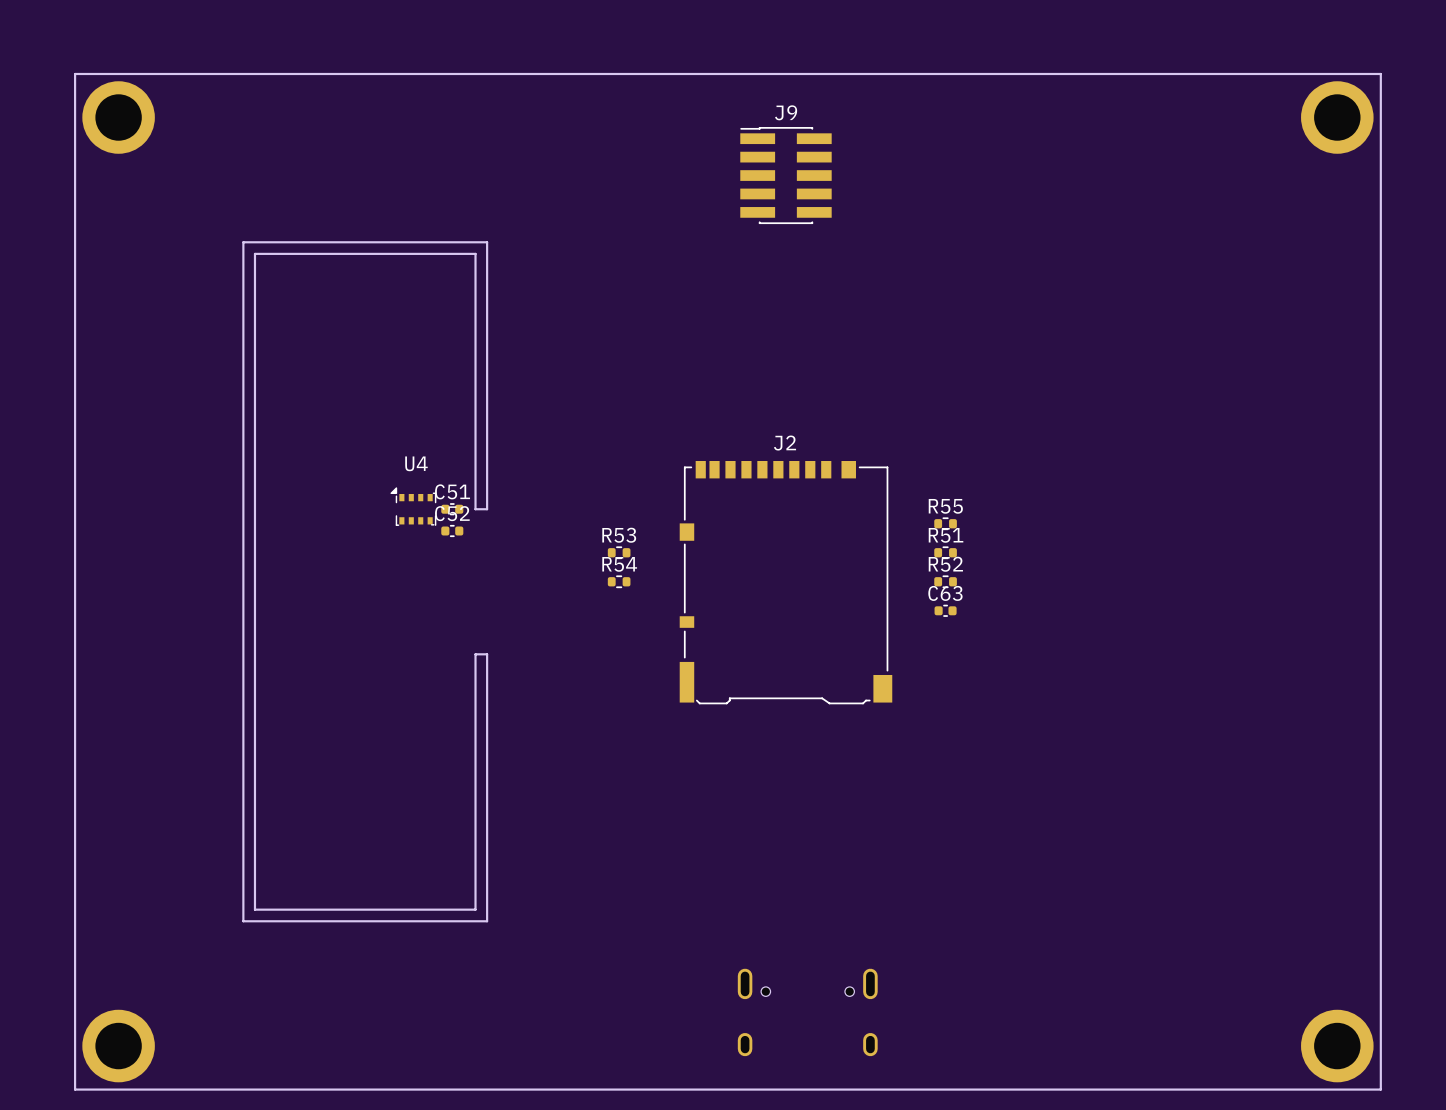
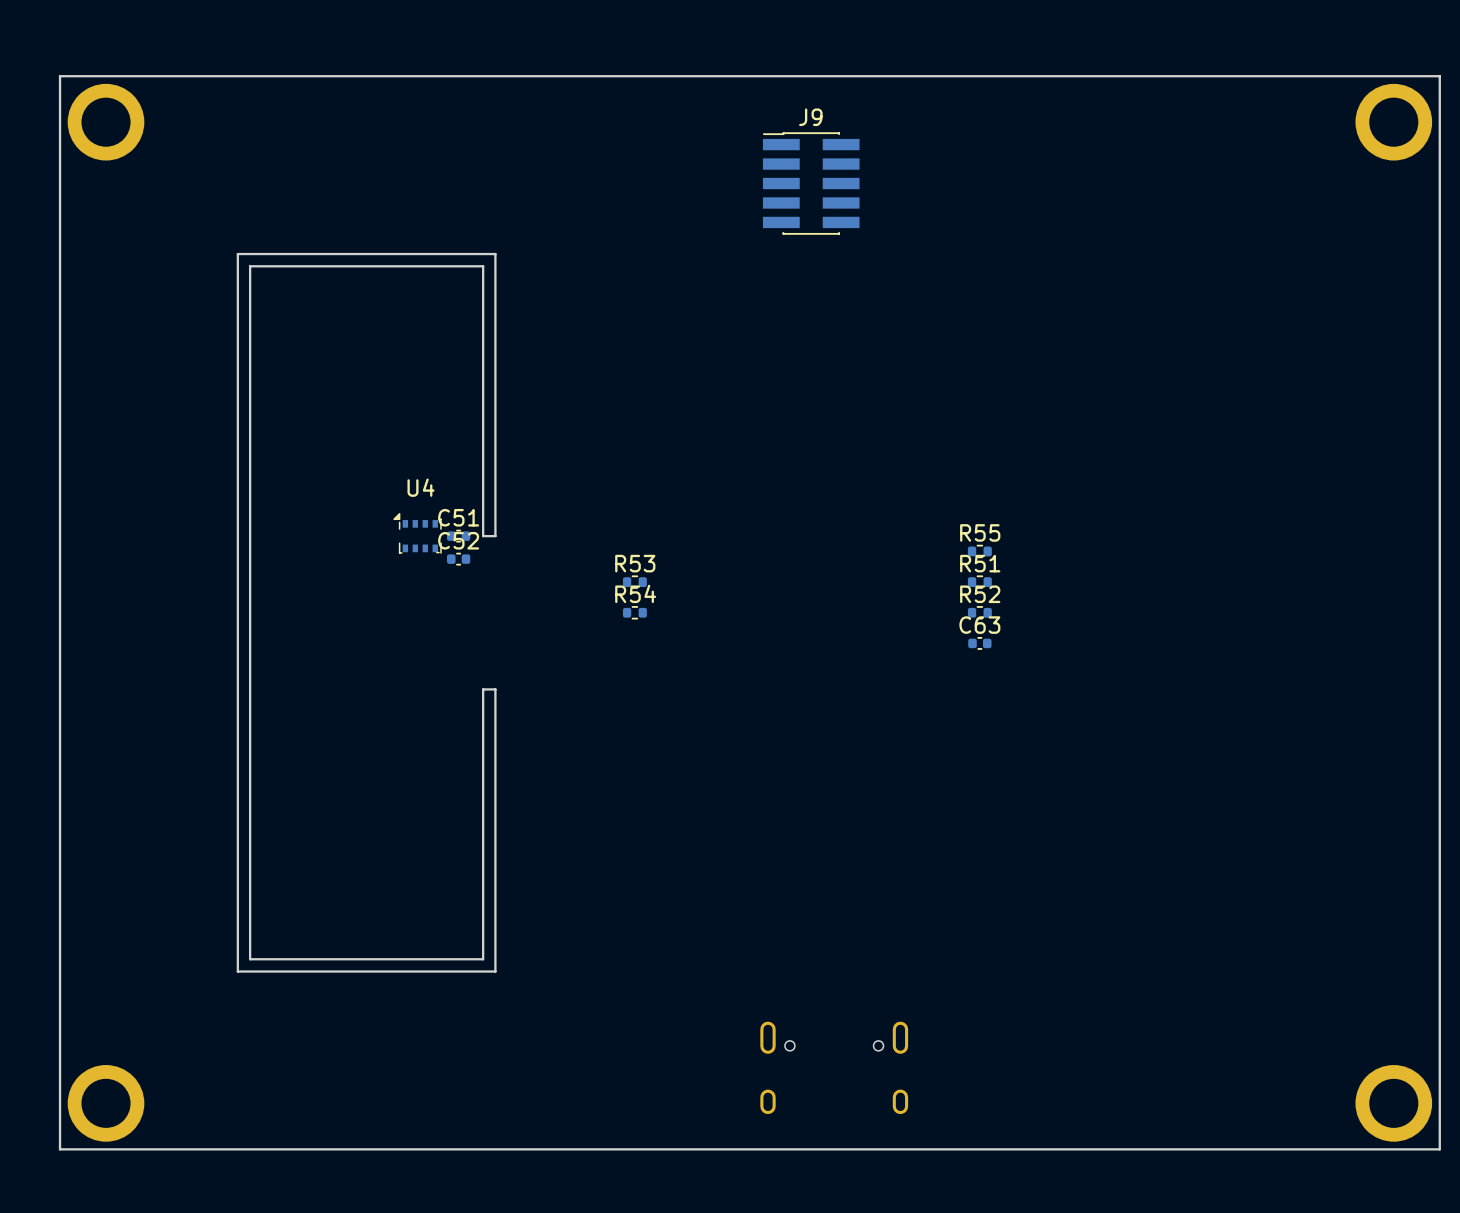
J2: (785, 582) -> none

